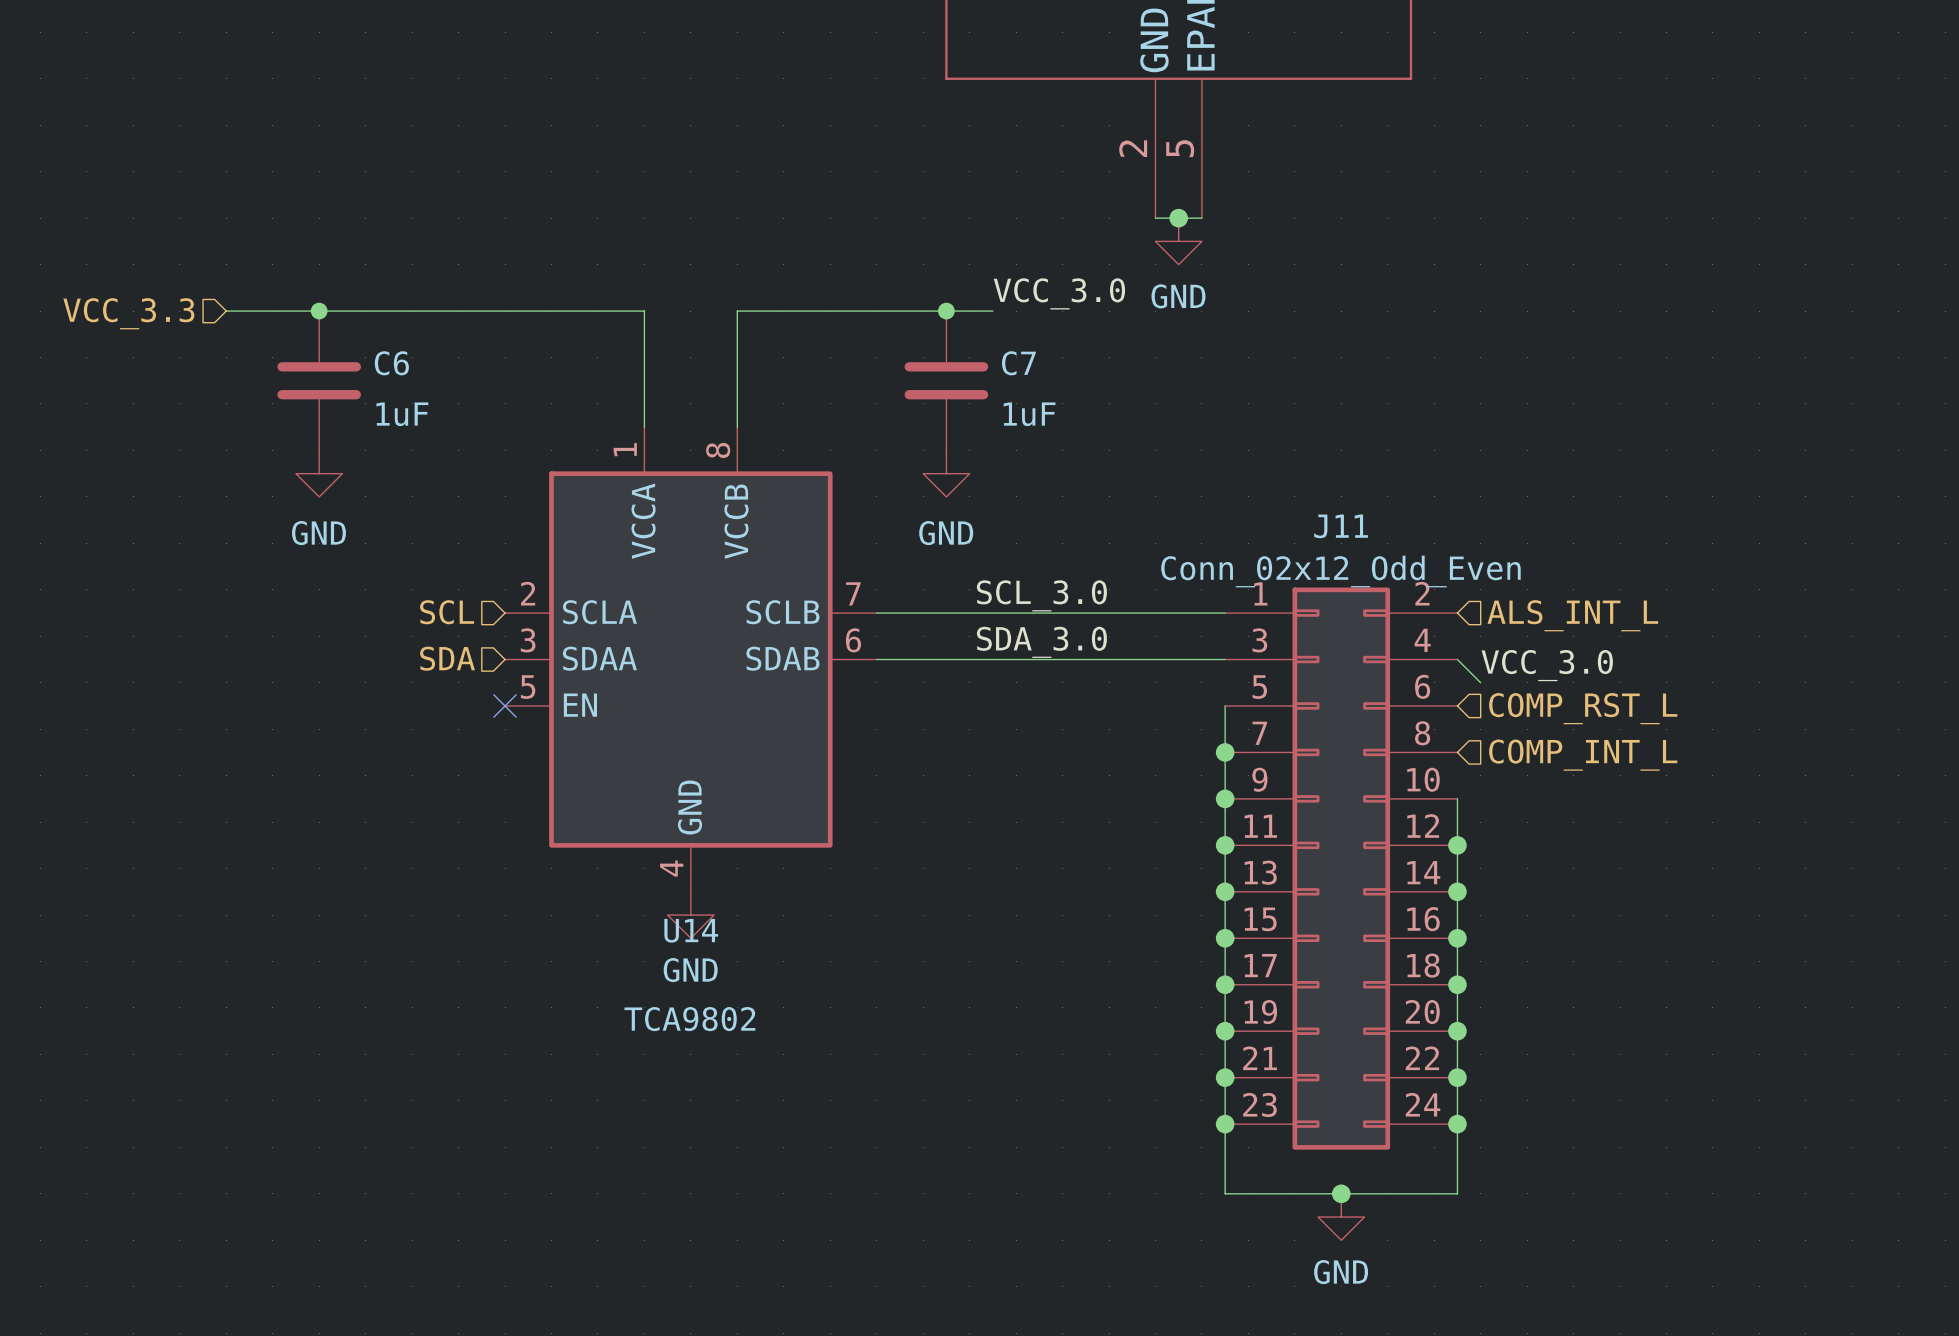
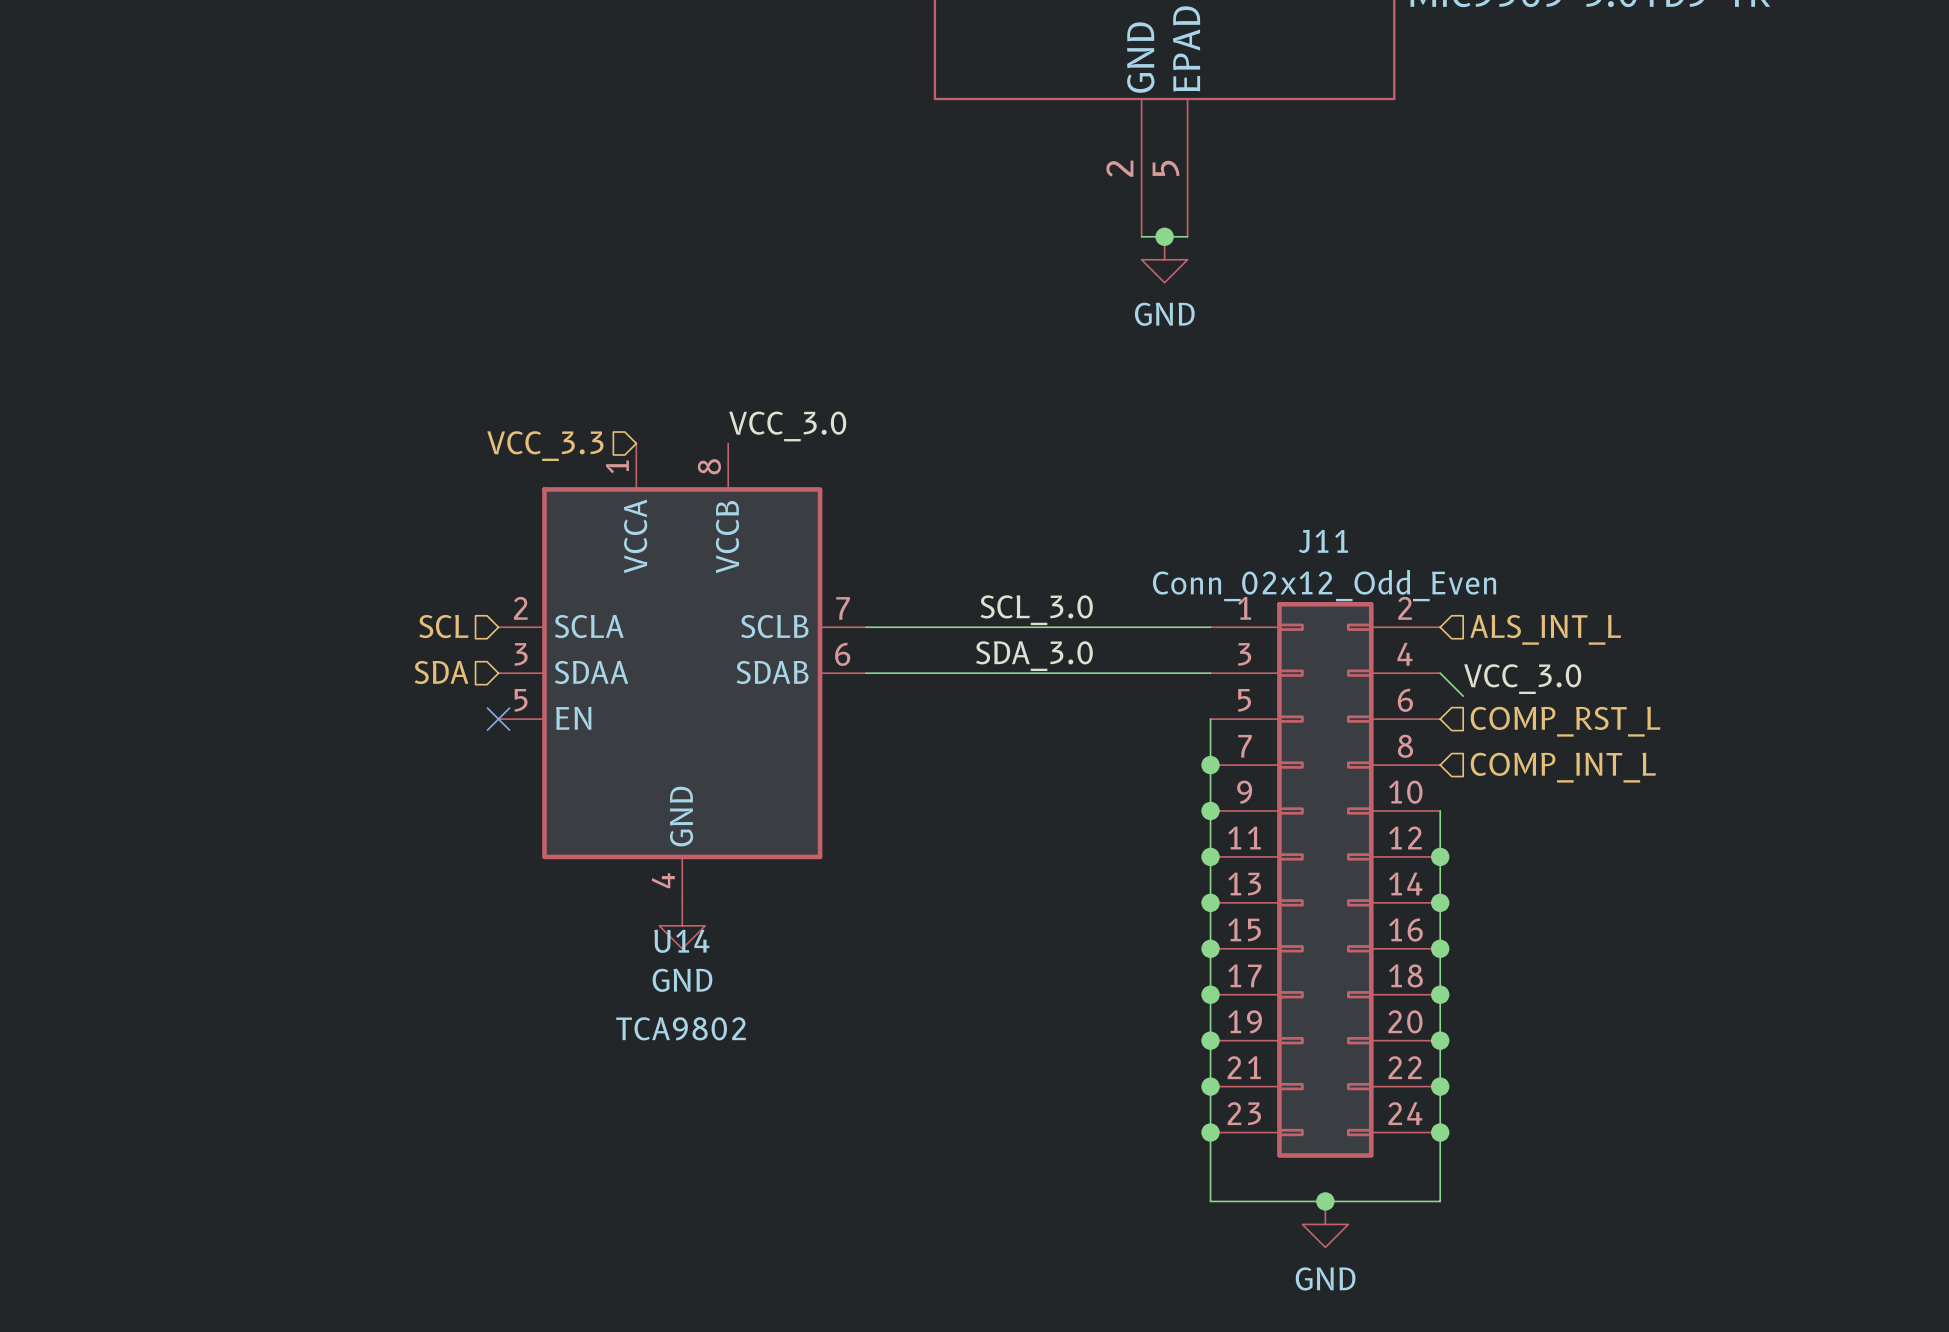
label position: VCC_3.0 (1059, 293) -> VCC_3.0 (787, 426)
wire: (226, 311) (644, 311) (644, 427) -> none
junction: (319, 311) -> none
junction: (946, 311) -> none
wire: (992, 311) (737, 311) (737, 427) -> none
hierarchical label position: VCC_3.3 (128, 313) -> VCC_3.3 (545, 446)
C6: 1uF (319, 380) -> none
C7: 1uF (946, 380) -> none
power symbol: GND (319, 473) -> none
power symbol: GND (946, 473) -> none

